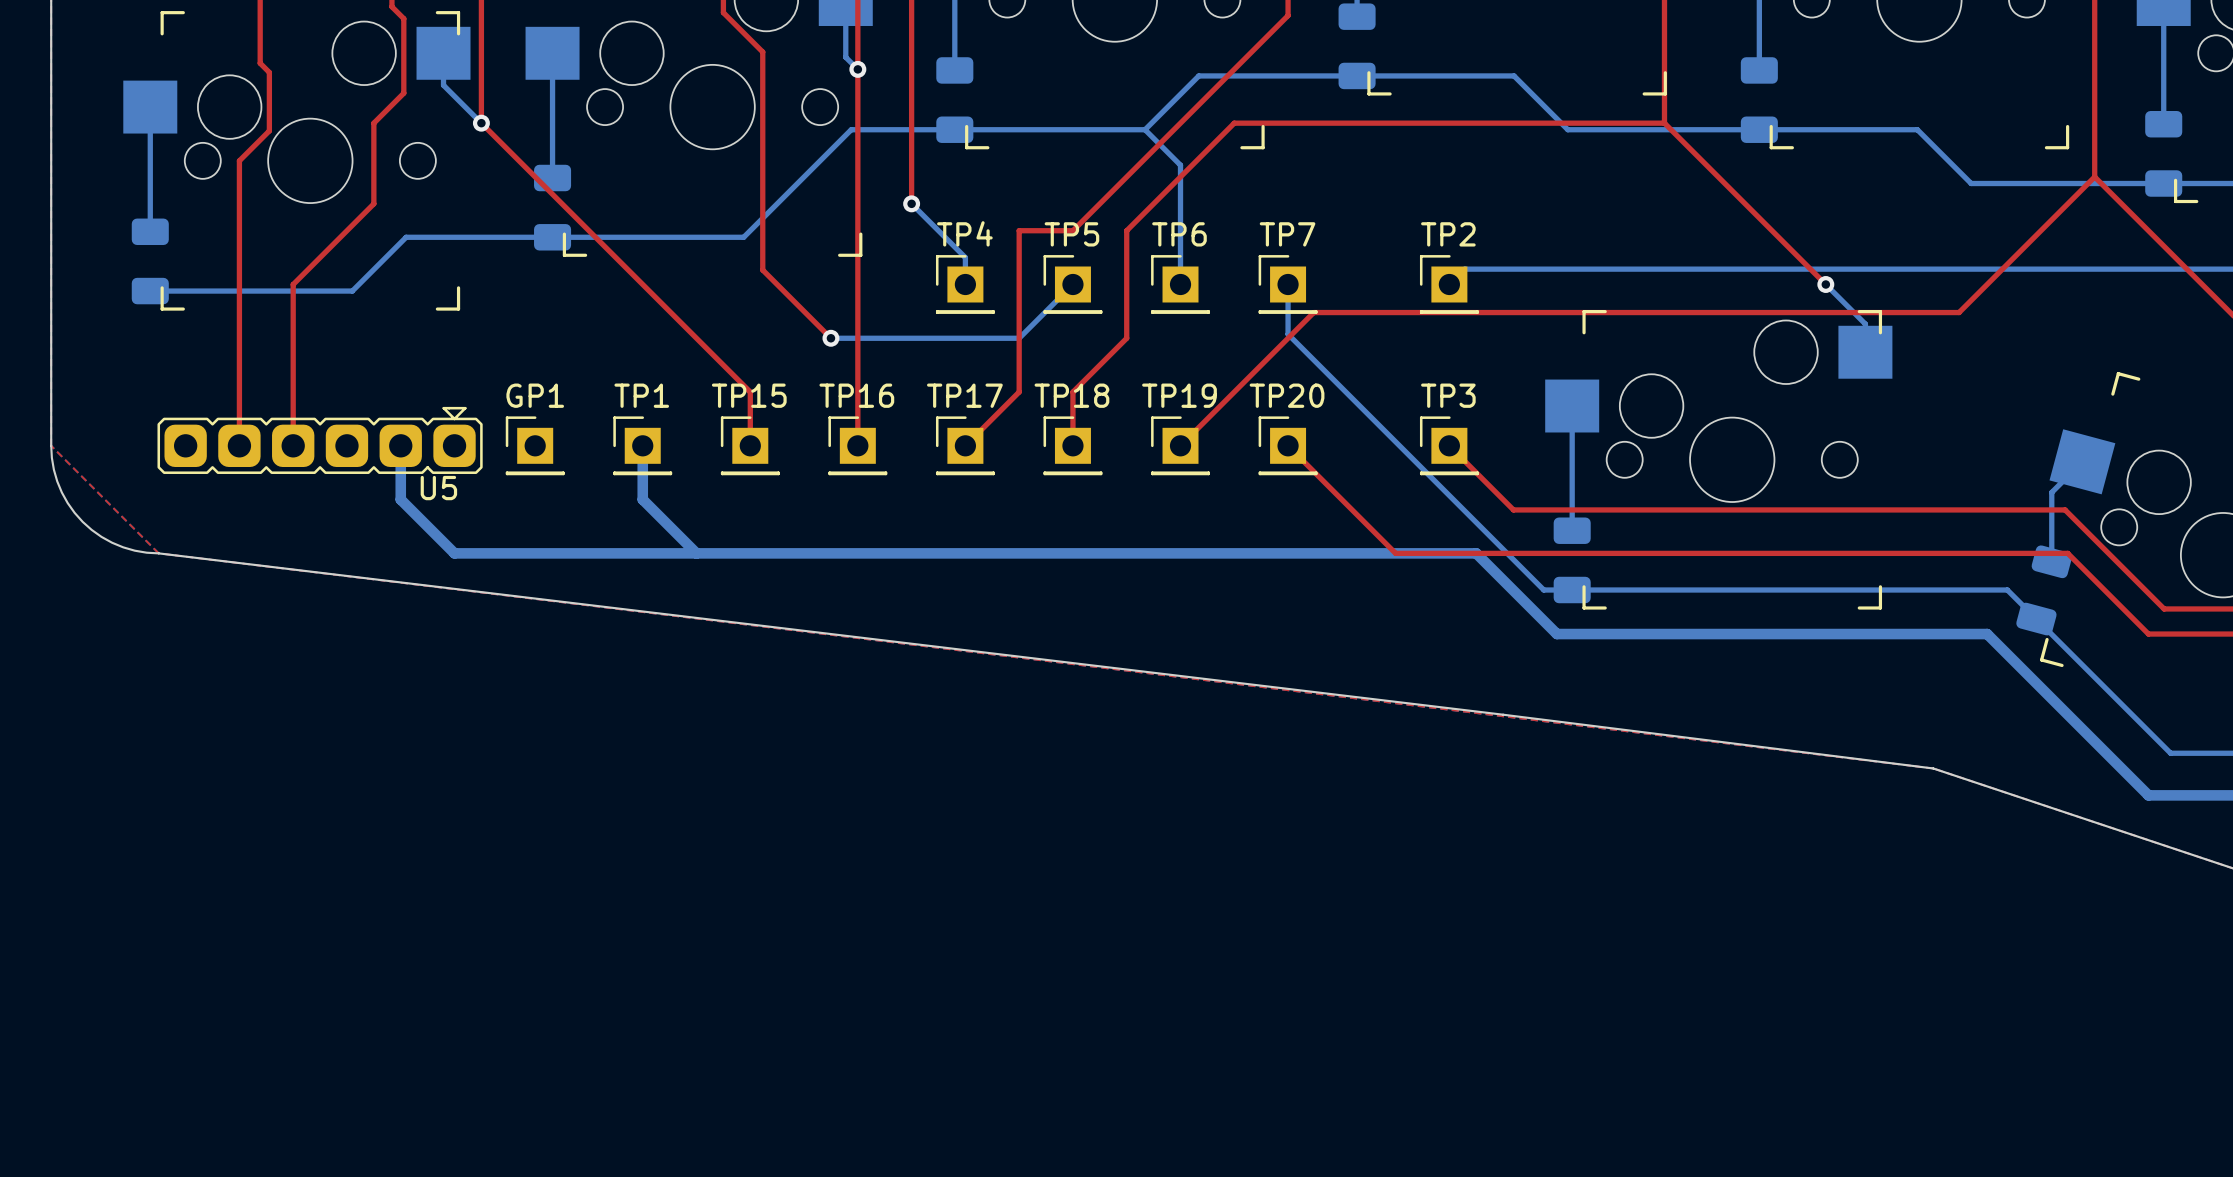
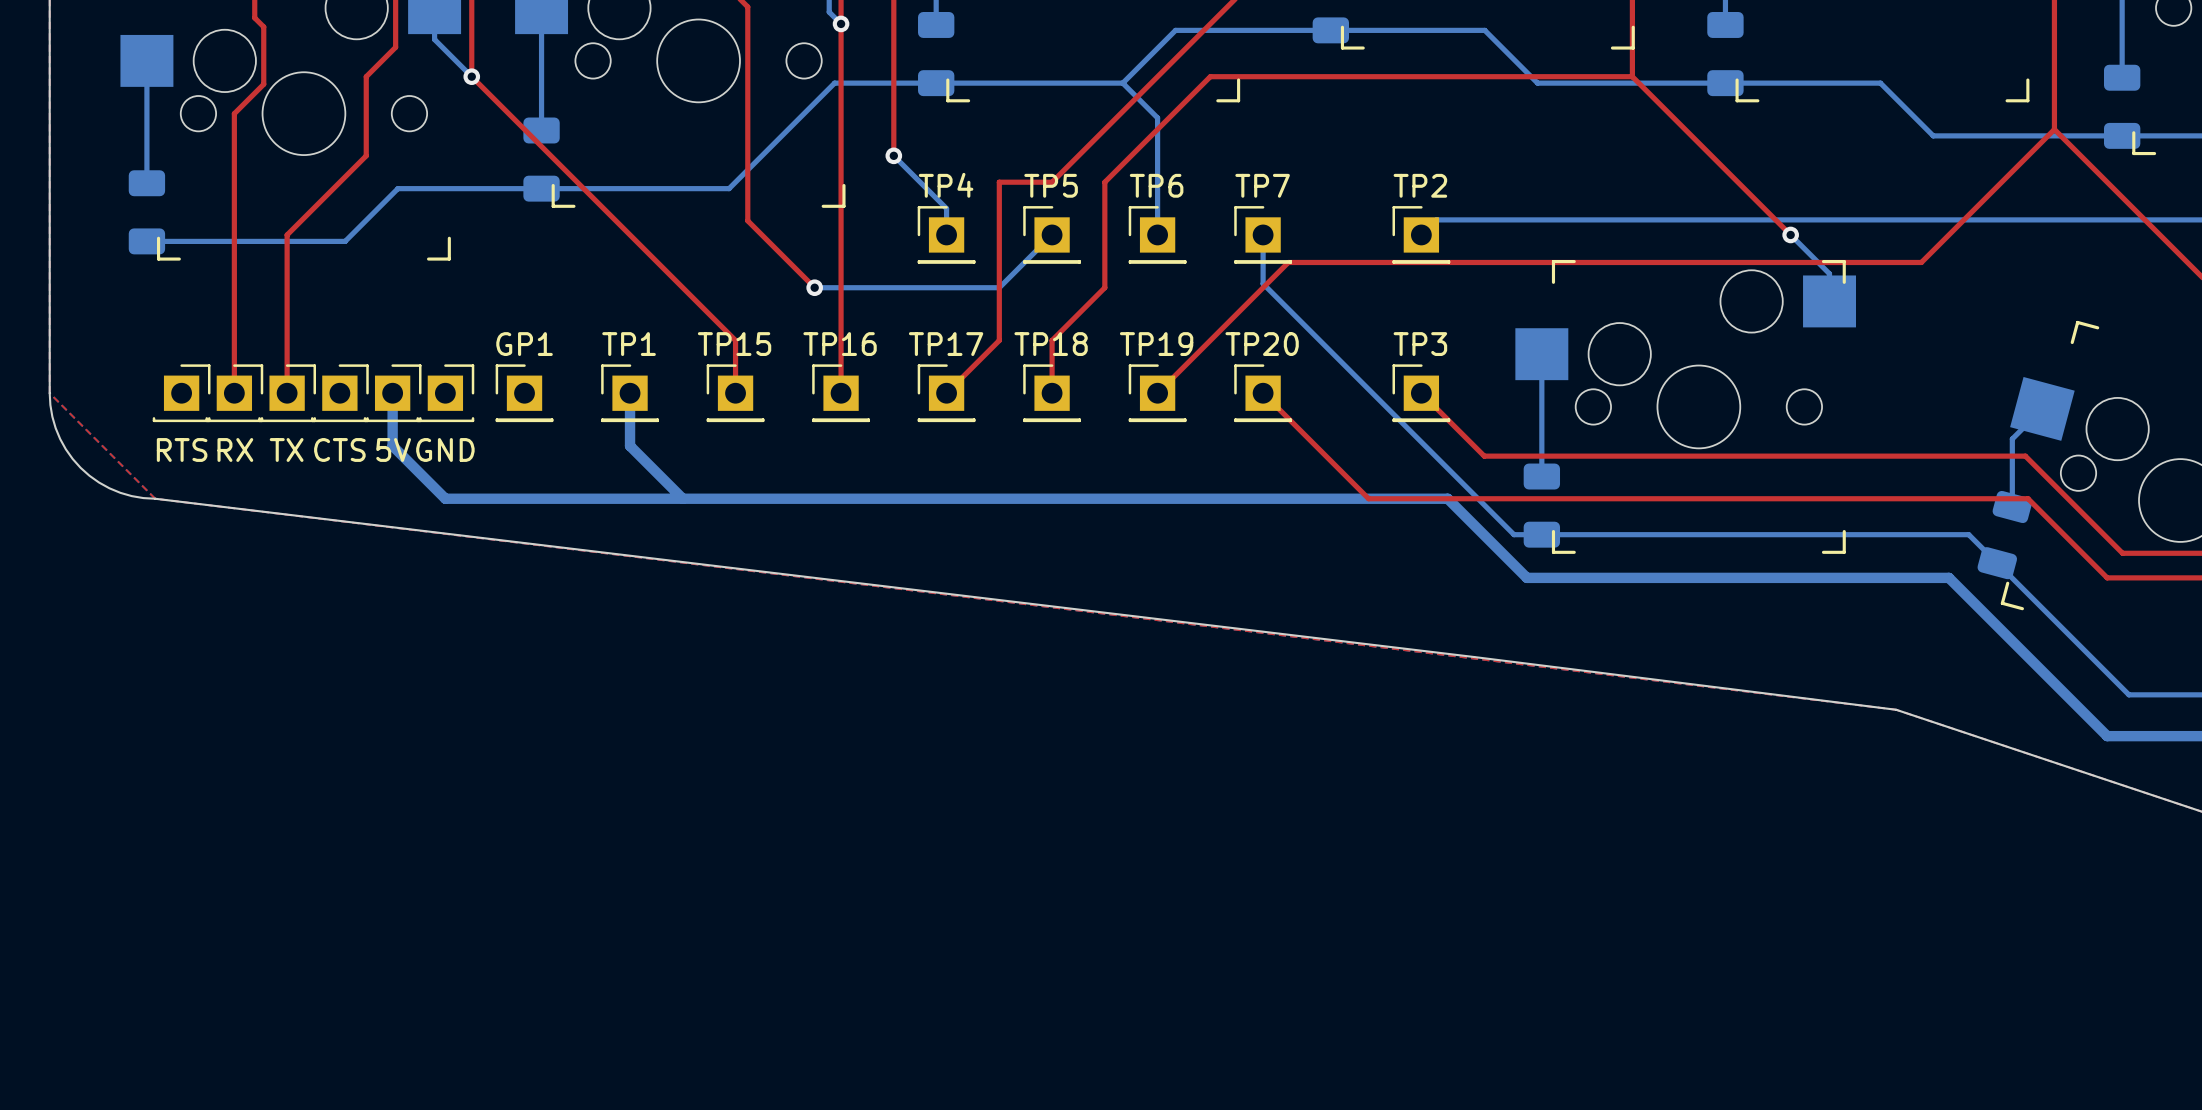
U5: (320, 440) -> none
part: none -> RTS (181, 393)
part: none -> RX (234, 393)
part: none -> TX (287, 393)
part: none -> CTS (339, 393)
part: none -> 5V (392, 393)
part: none -> GND (445, 393)

